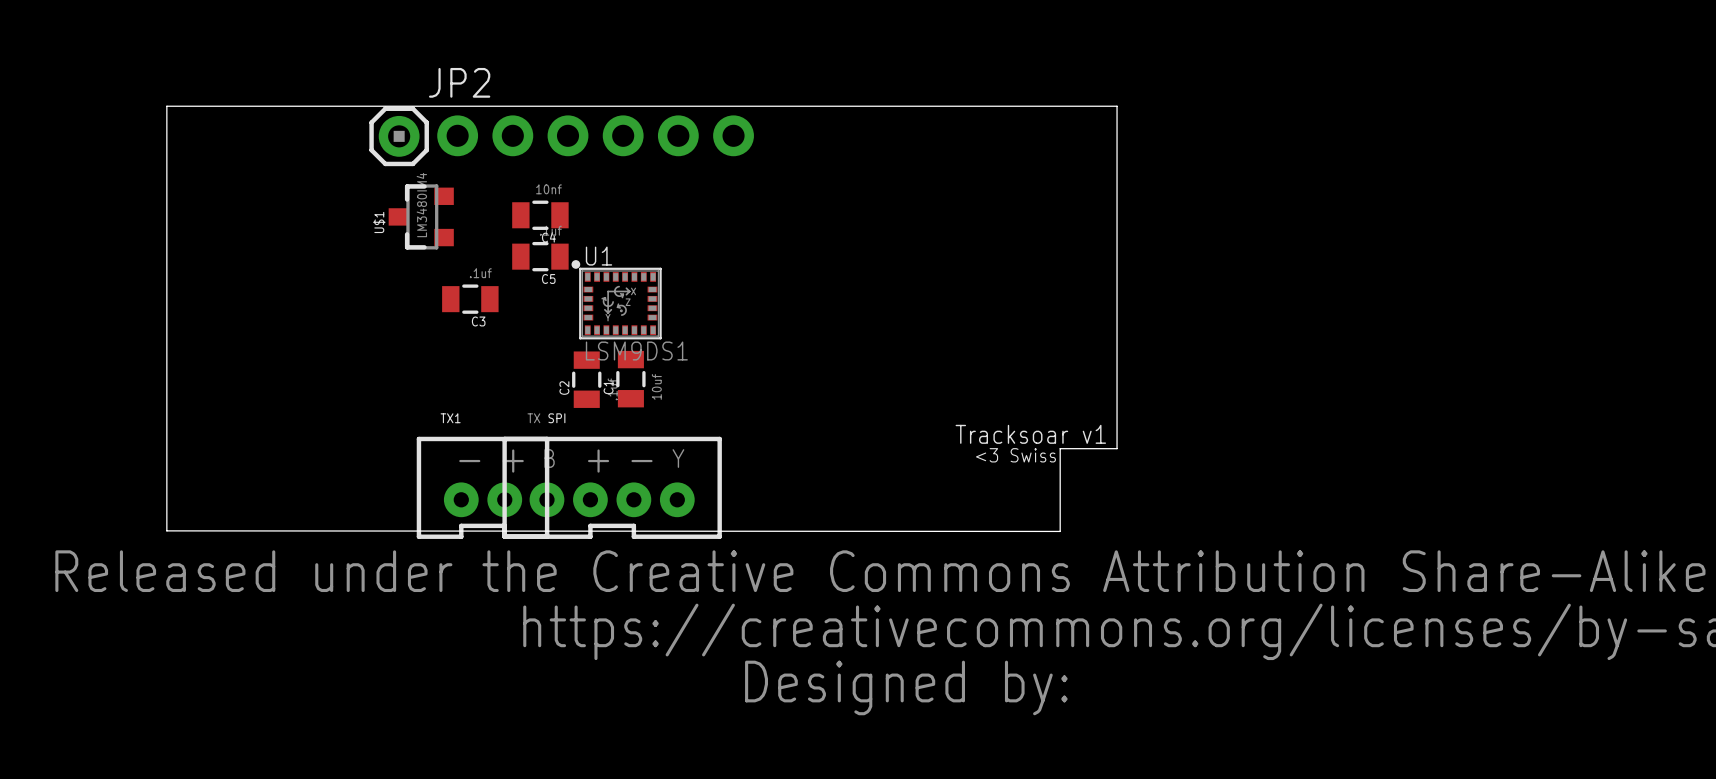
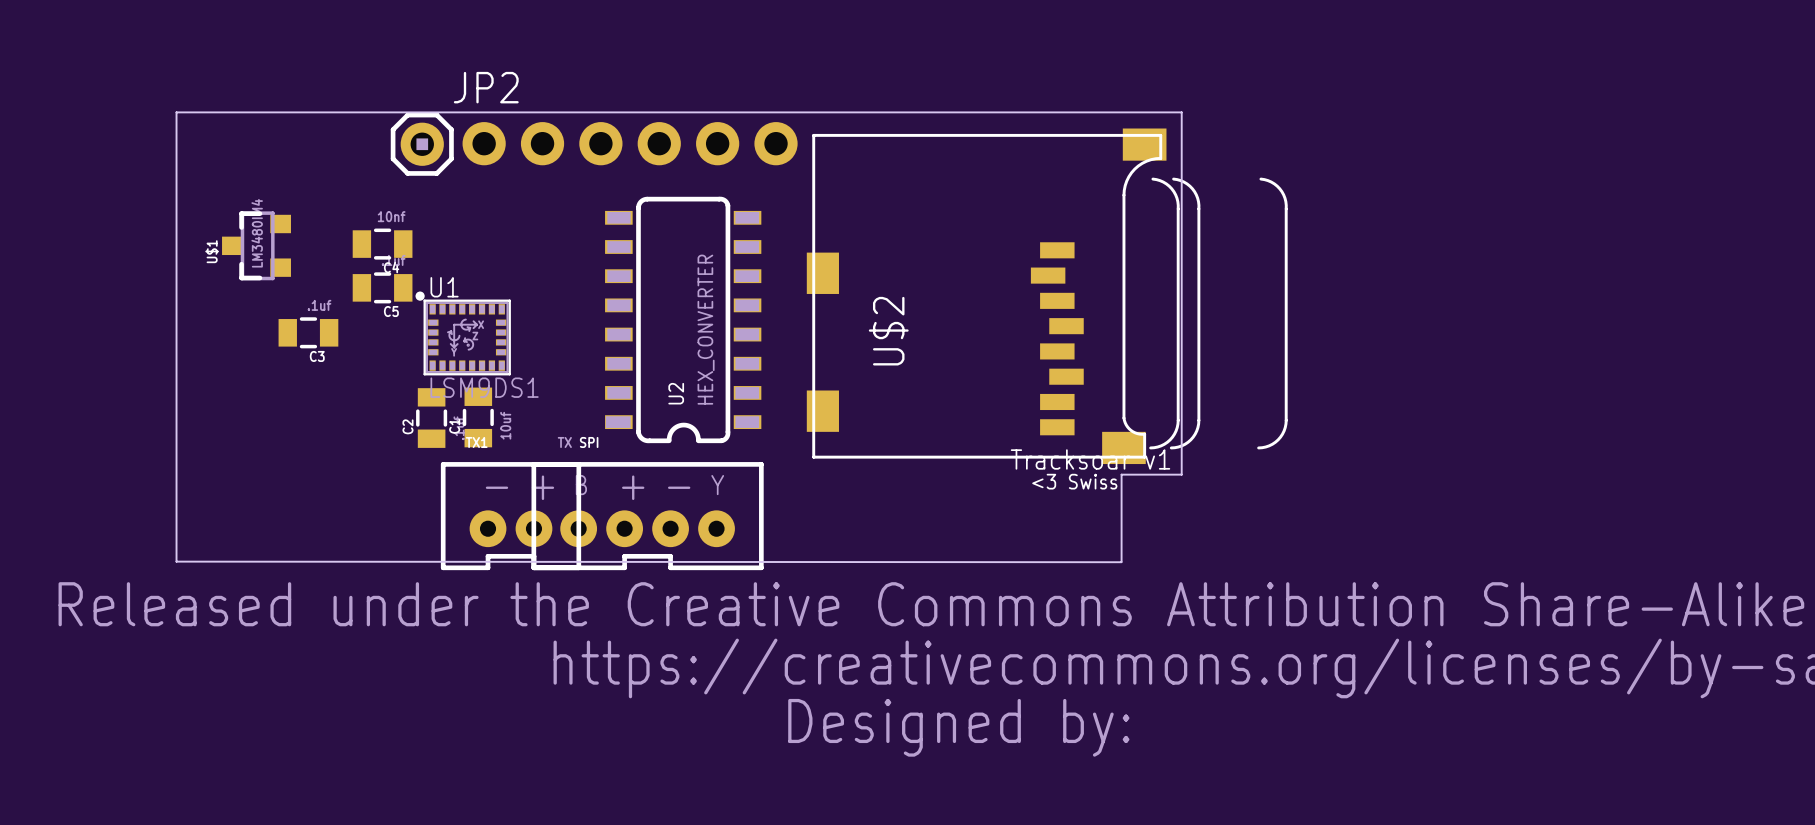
C4 position: (540, 215) -> (382, 244)
U$1 position: (421, 216) -> (256, 245)
C5 position: (540, 256) -> (382, 287)
U$2: none -> (1047, 296)
C3 position: (470, 299) -> (308, 332)
U1 position: (616, 299) -> (463, 333)
U2: none -> HEX_CONVERTER (683, 319)
C2 position: (586, 379) -> (431, 418)
C1 position: (630, 379) -> (478, 417)

